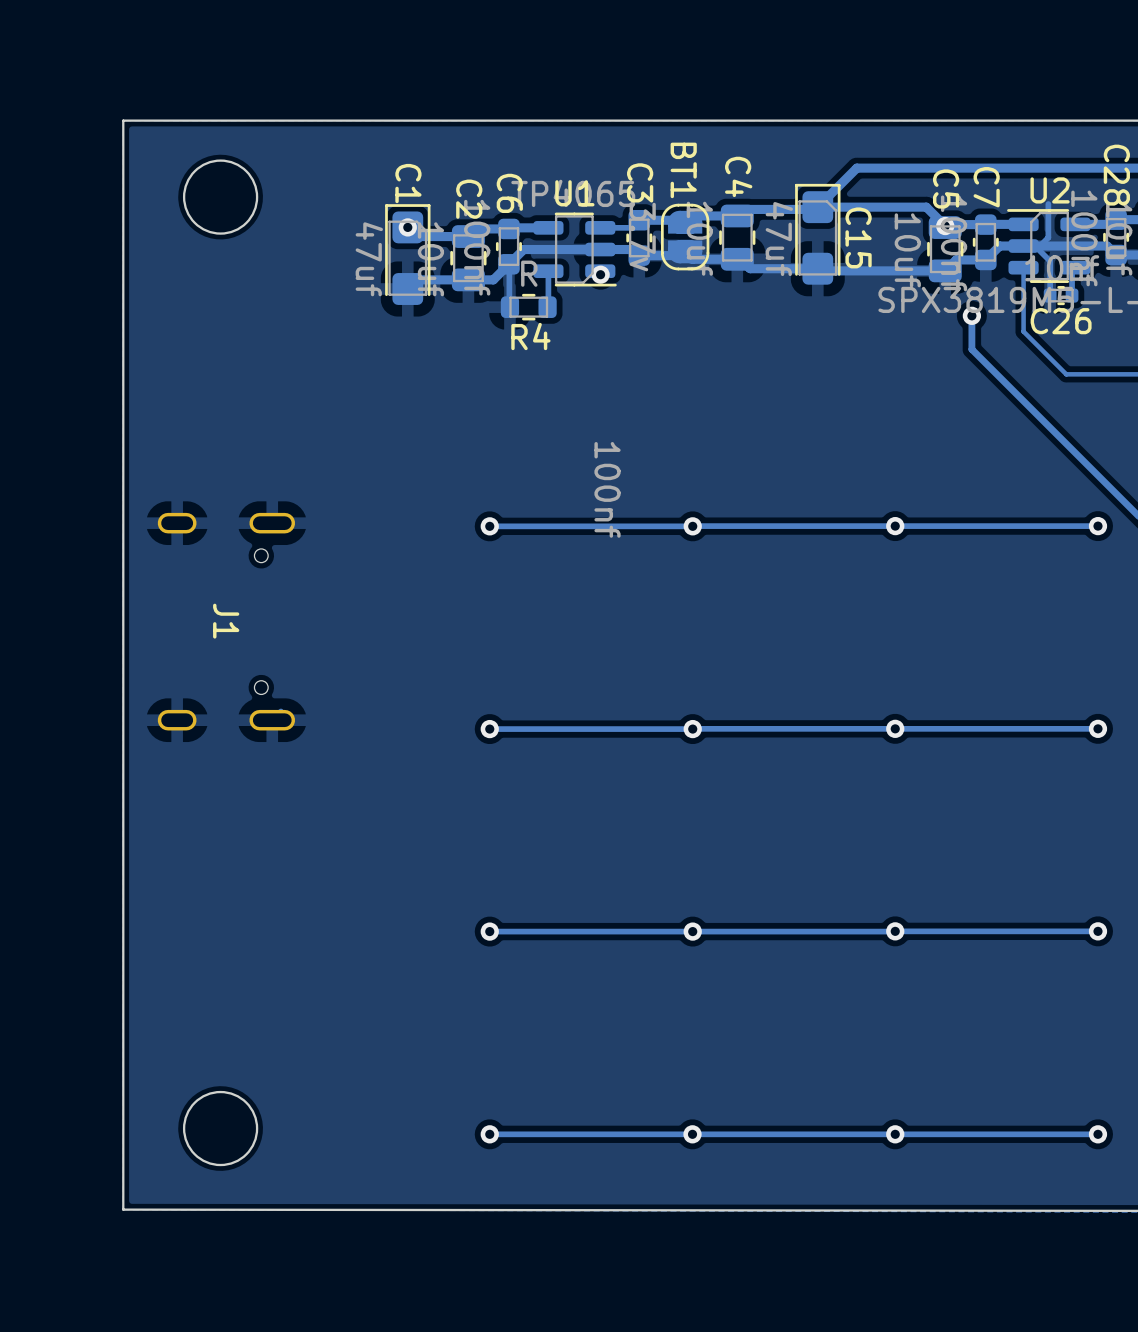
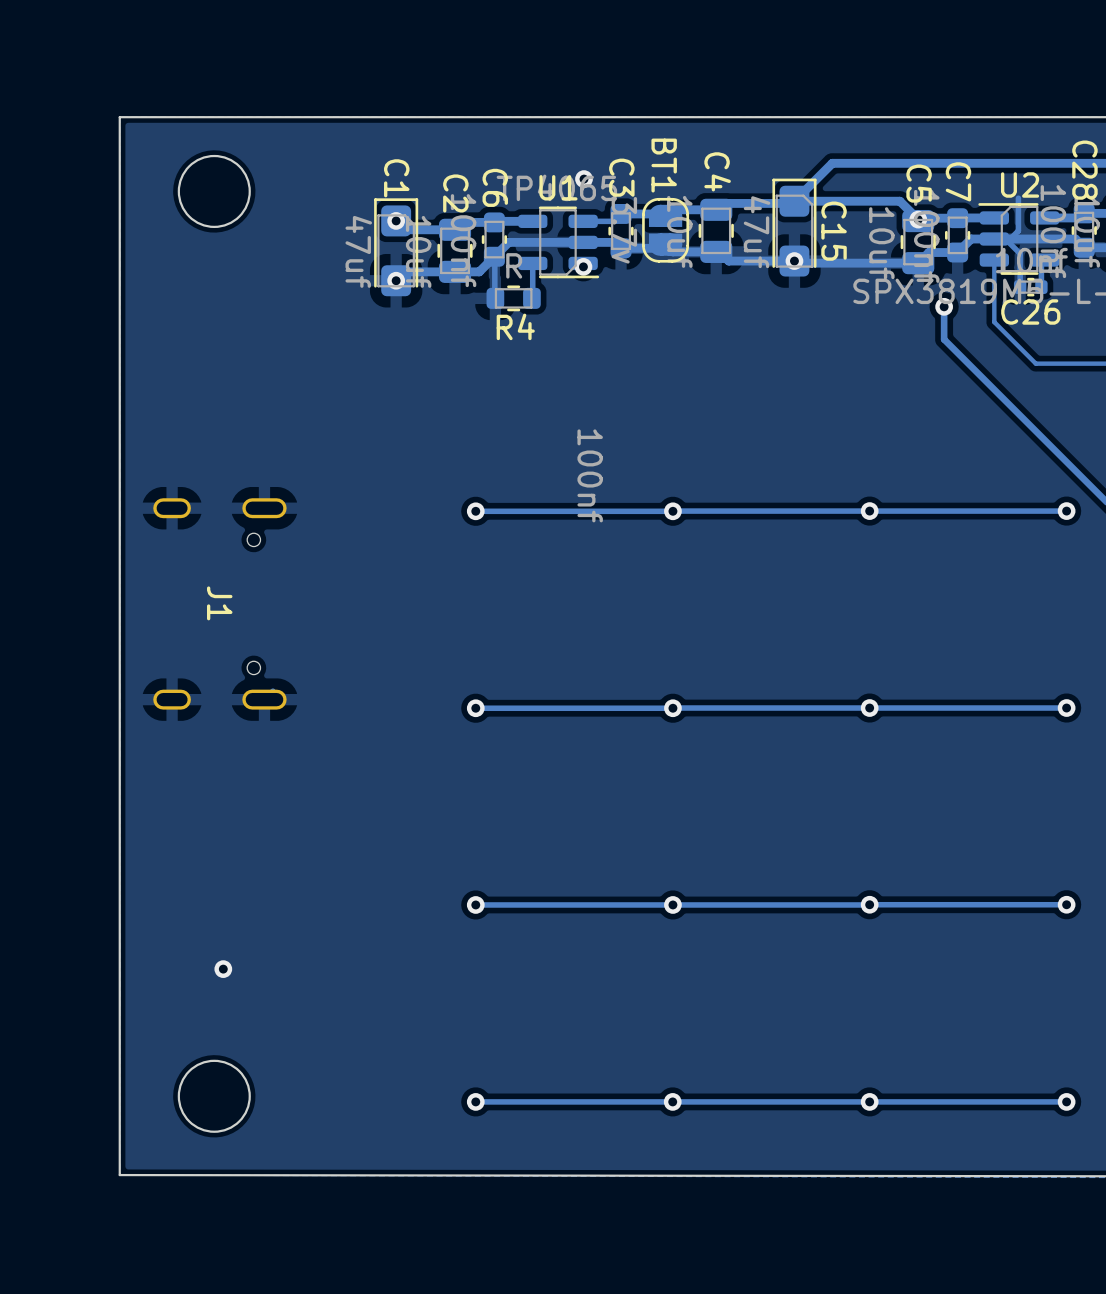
via: none -> (584, 179)
via: none -> (794, 261)
via: none -> (396, 280)
via: none -> (223, 969)

